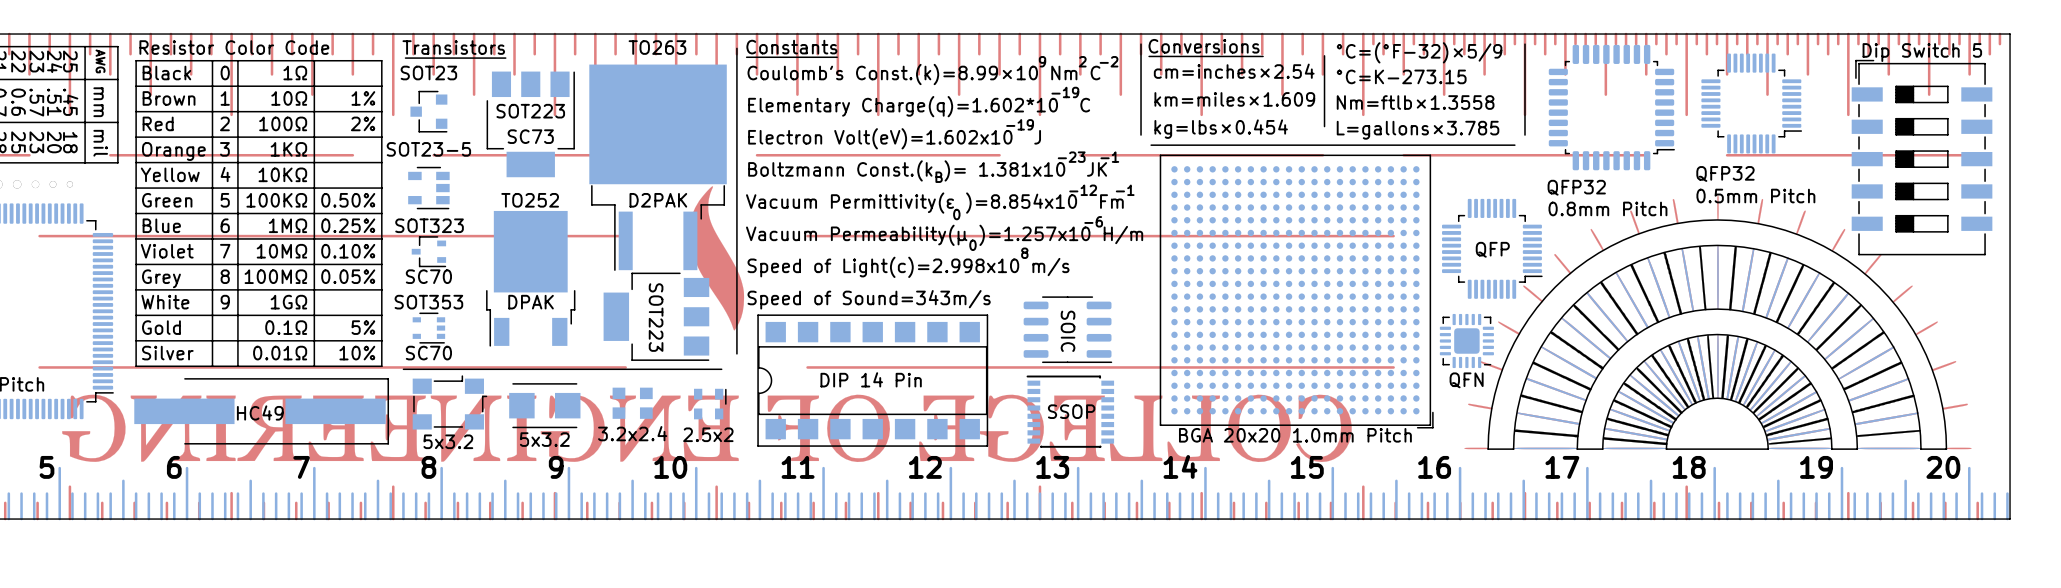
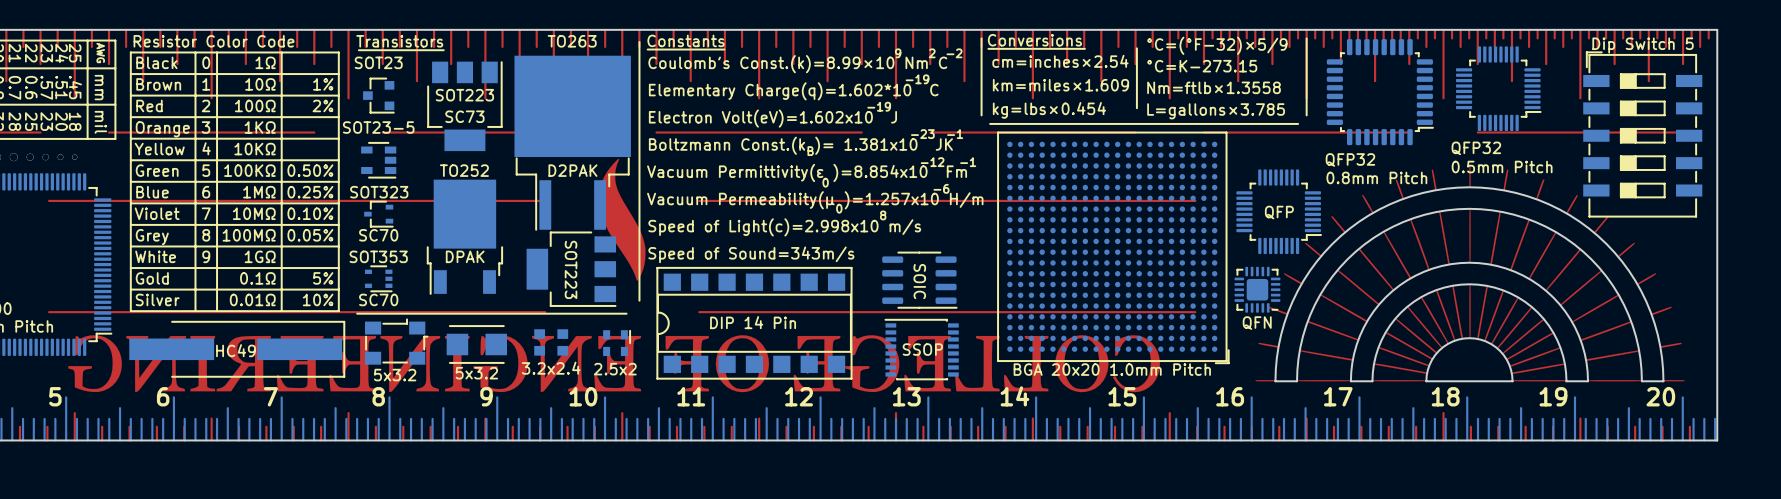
drawing: [1514, 245, 1922, 450] -> none

